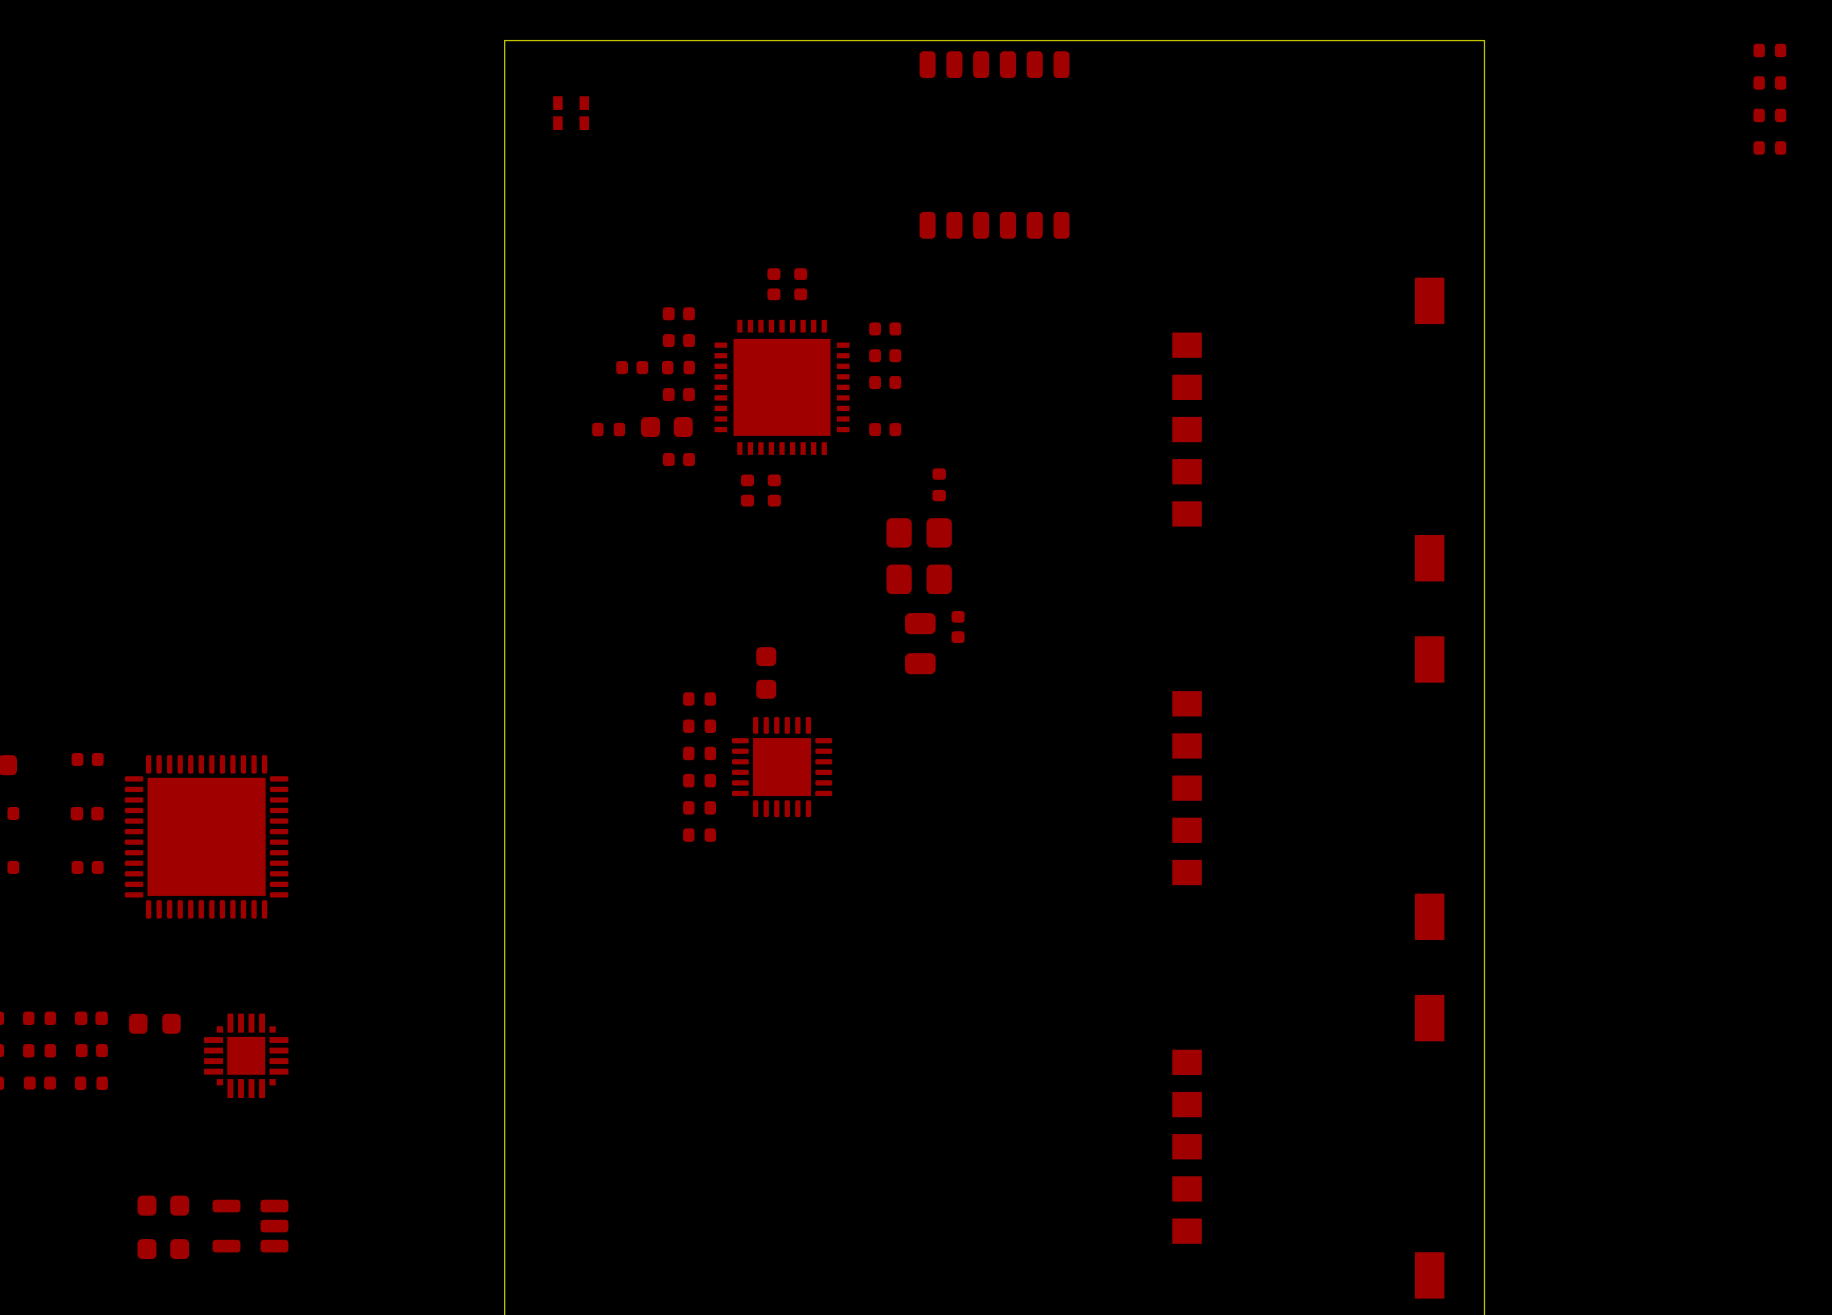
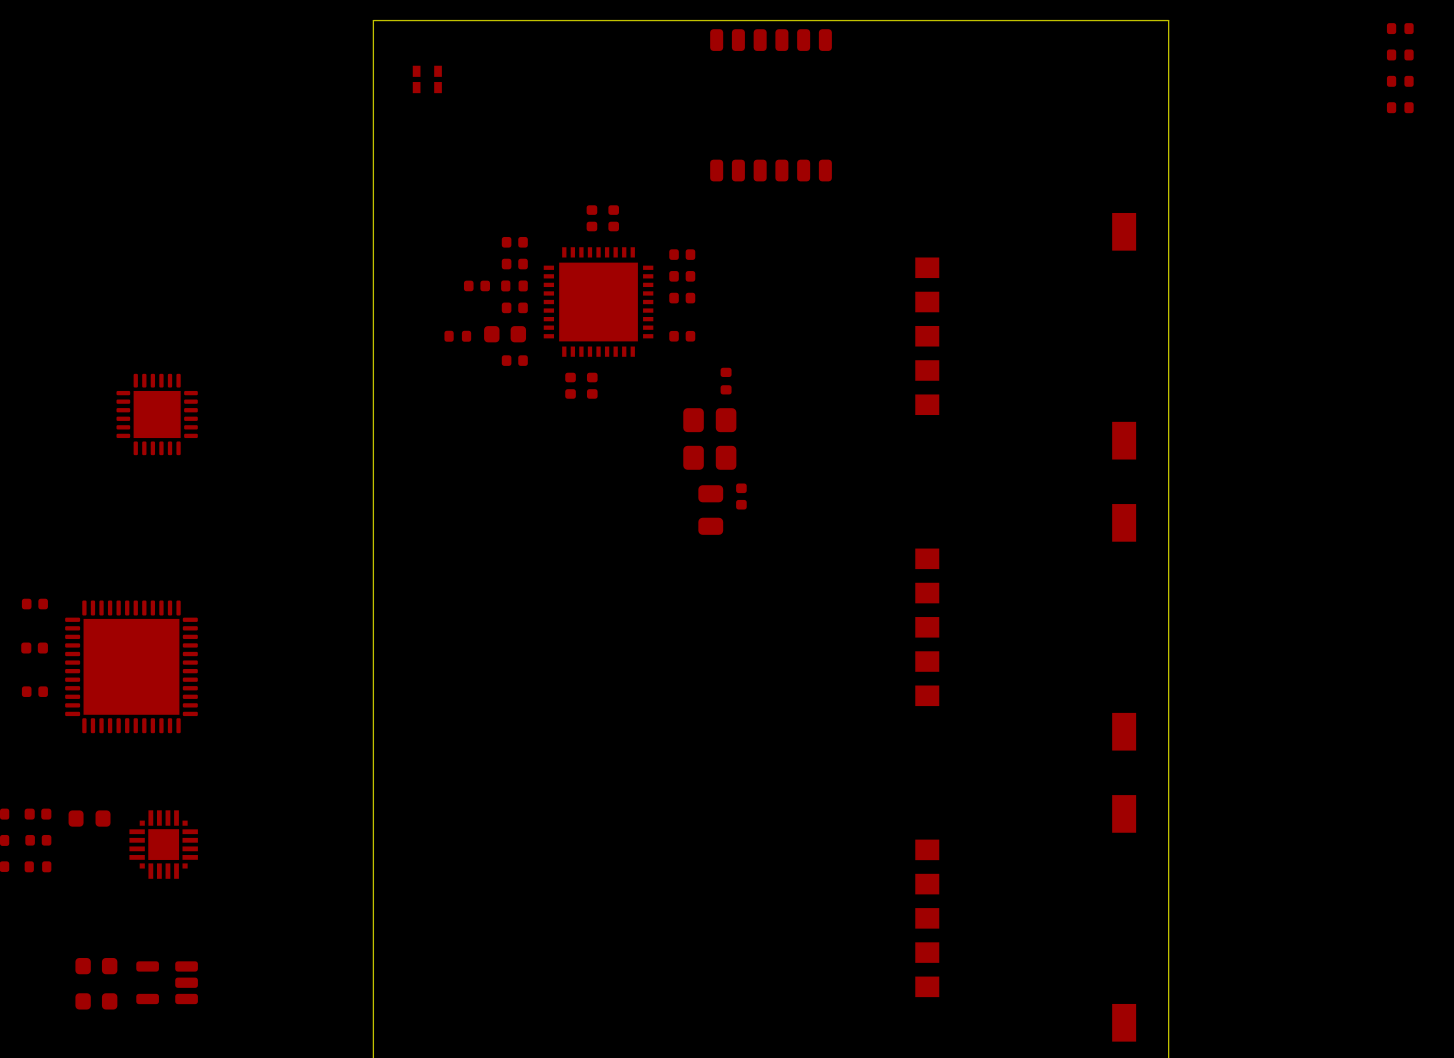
part: none -> (157, 414)
part: (766, 672) -> none
part: (699, 699) -> none
part: (699, 726) -> none
part: (699, 753) -> none
part: (782, 767) -> none
part: (699, 780) -> none
part: (699, 807) -> none
part: (699, 835) -> none

